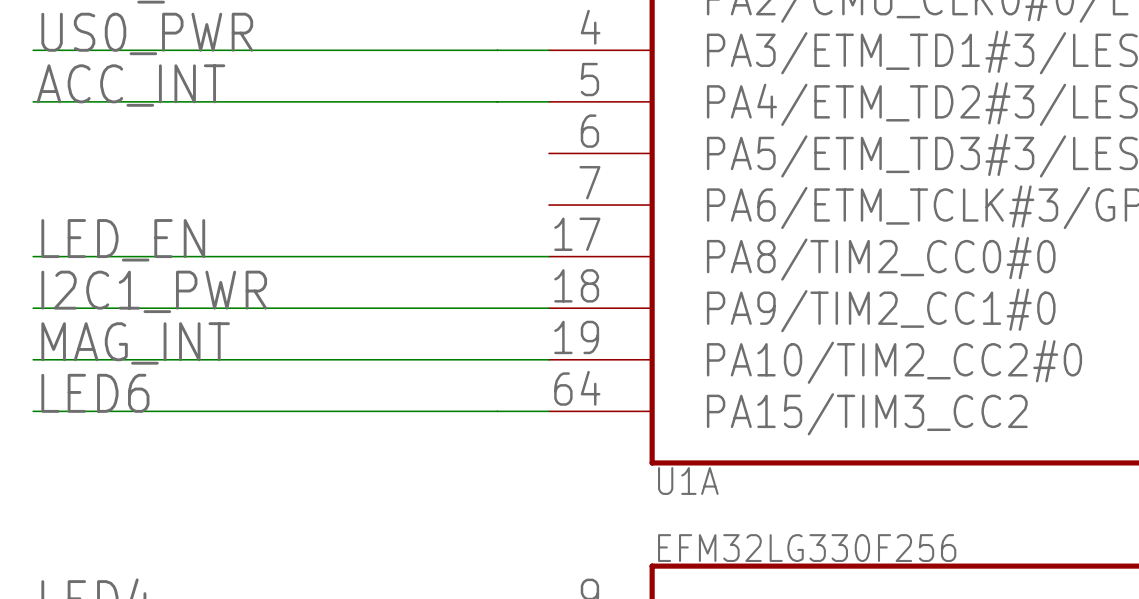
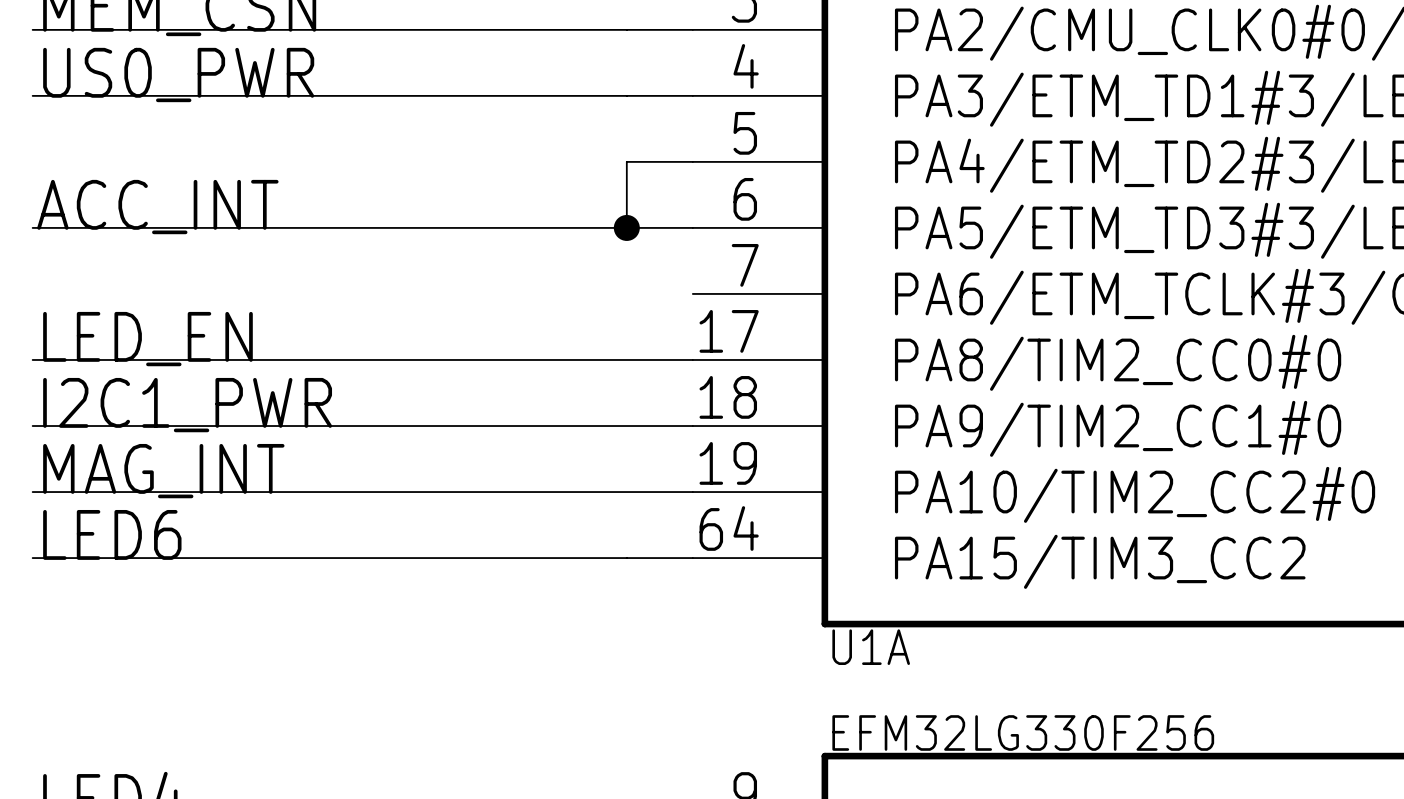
label position: ACC_INT (131, 85) -> ACC_INT (157, 207)
wire: (33, 101) (497, 101) -> (626, 227) (626, 161)
wire: none -> (32, 227) (692, 227)
junction: none -> (626, 227)

